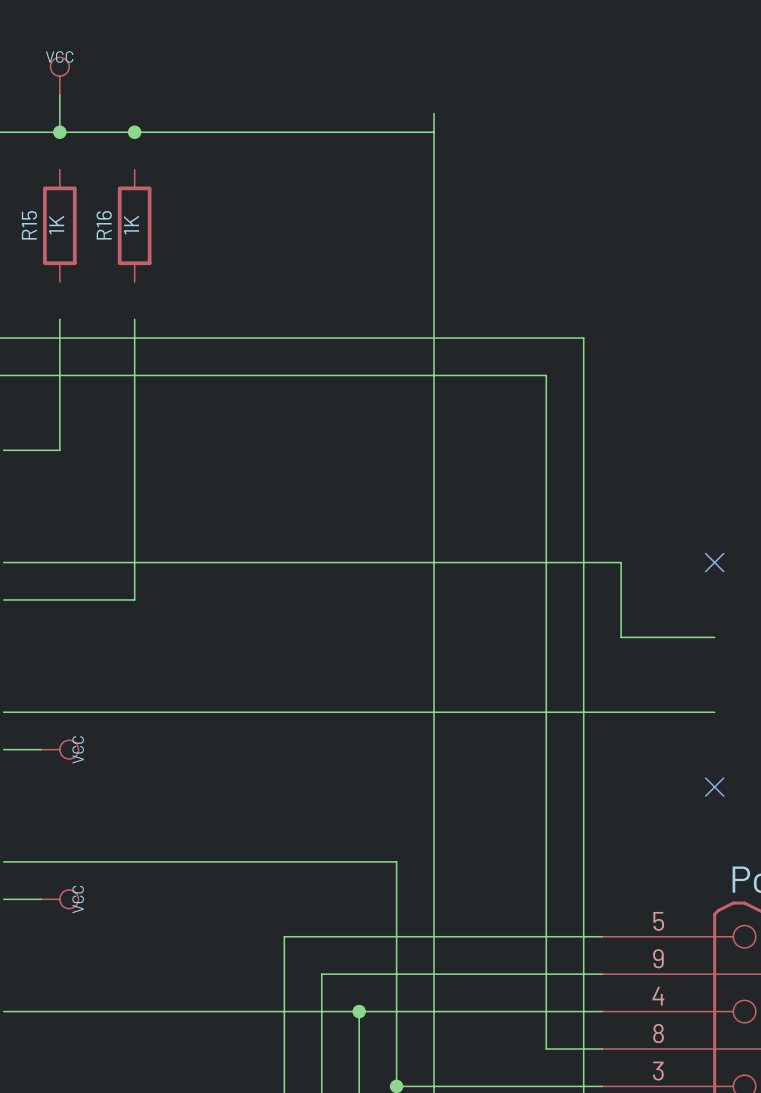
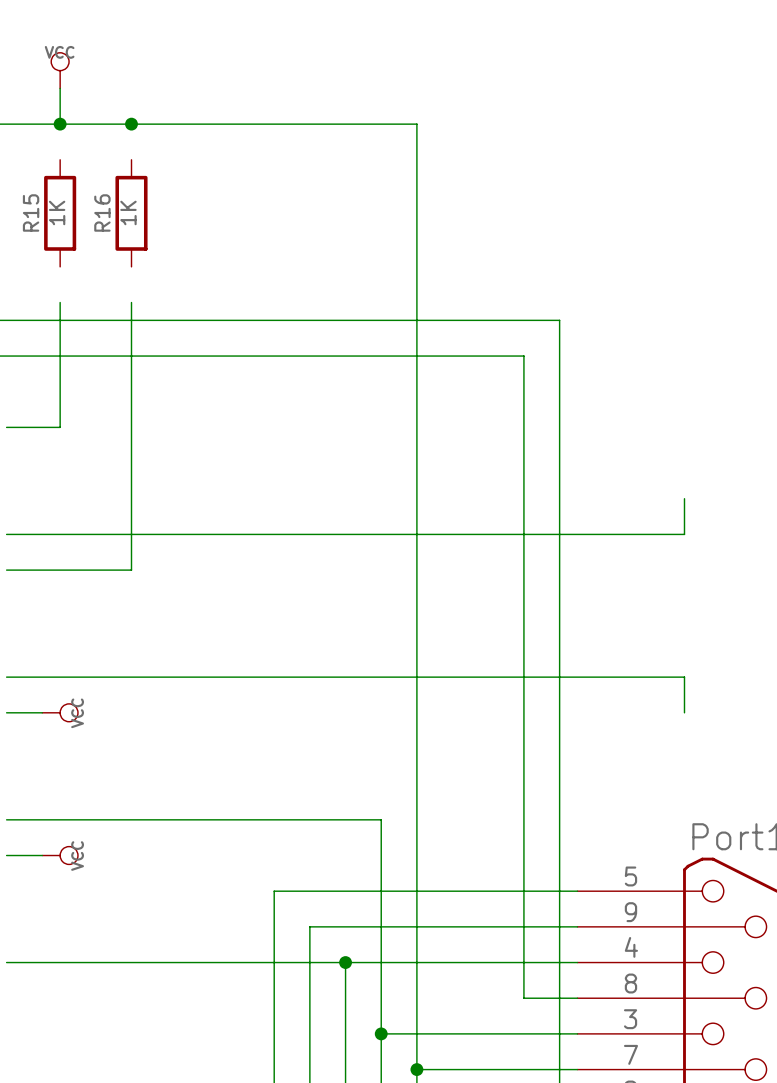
wire: (434, 113) (434, 132) -> none
wire: (621, 562) (621, 637) (714, 637) -> (595, 534) (684, 534) (684, 498)
no-connect mark: (714, 562) -> none
wire: none -> (684, 677) (684, 712)
no-connect mark: (714, 787) -> none

